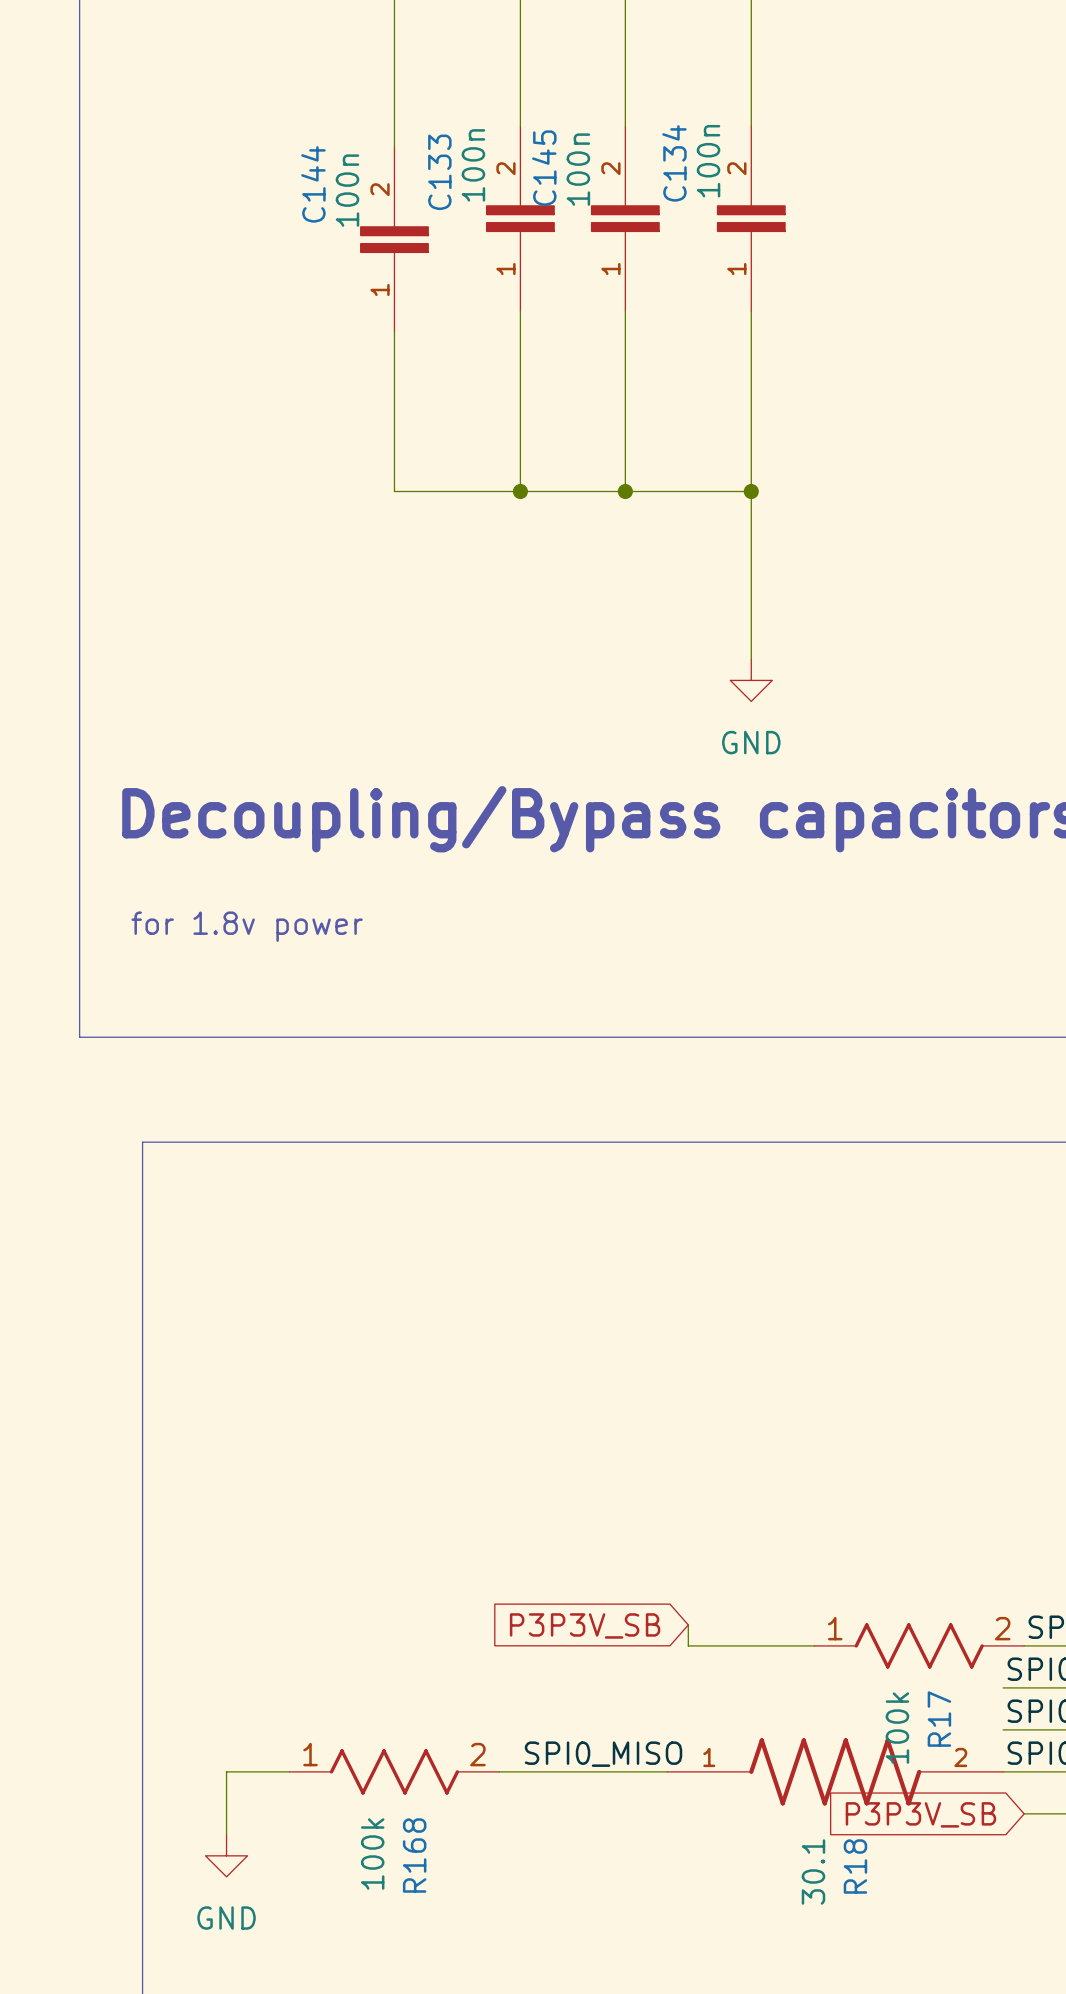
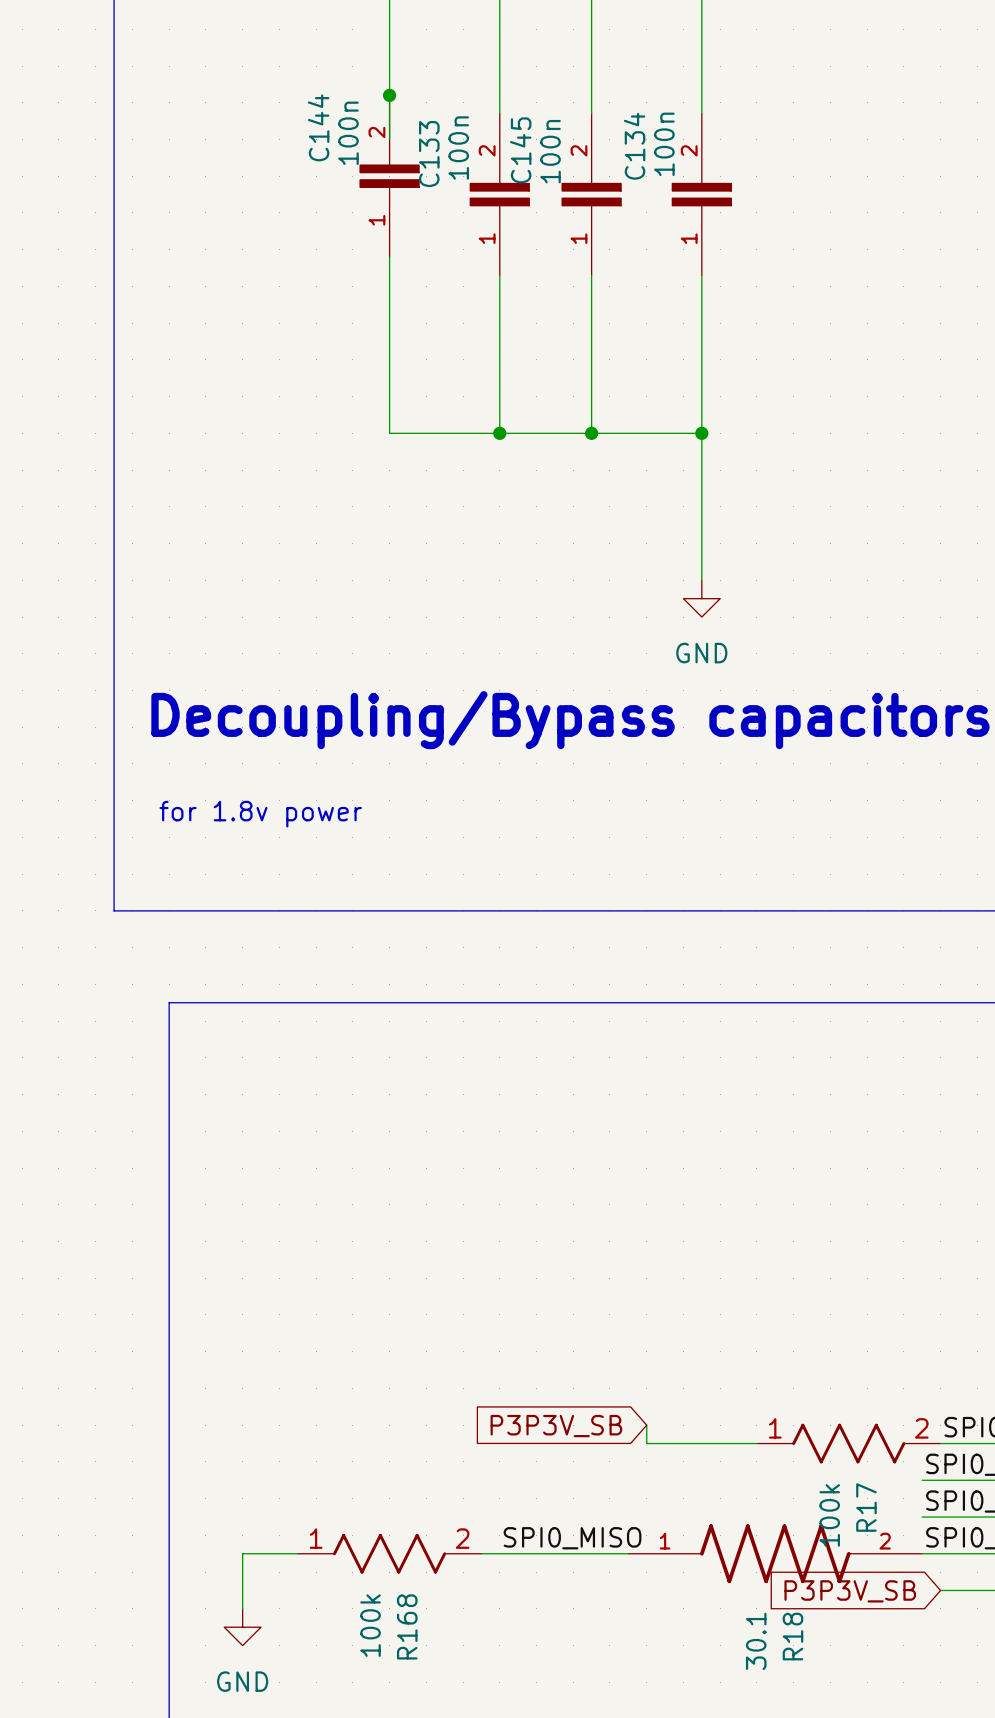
junction: none -> (389, 95)
C144 position: (394, 239) -> (389, 176)

